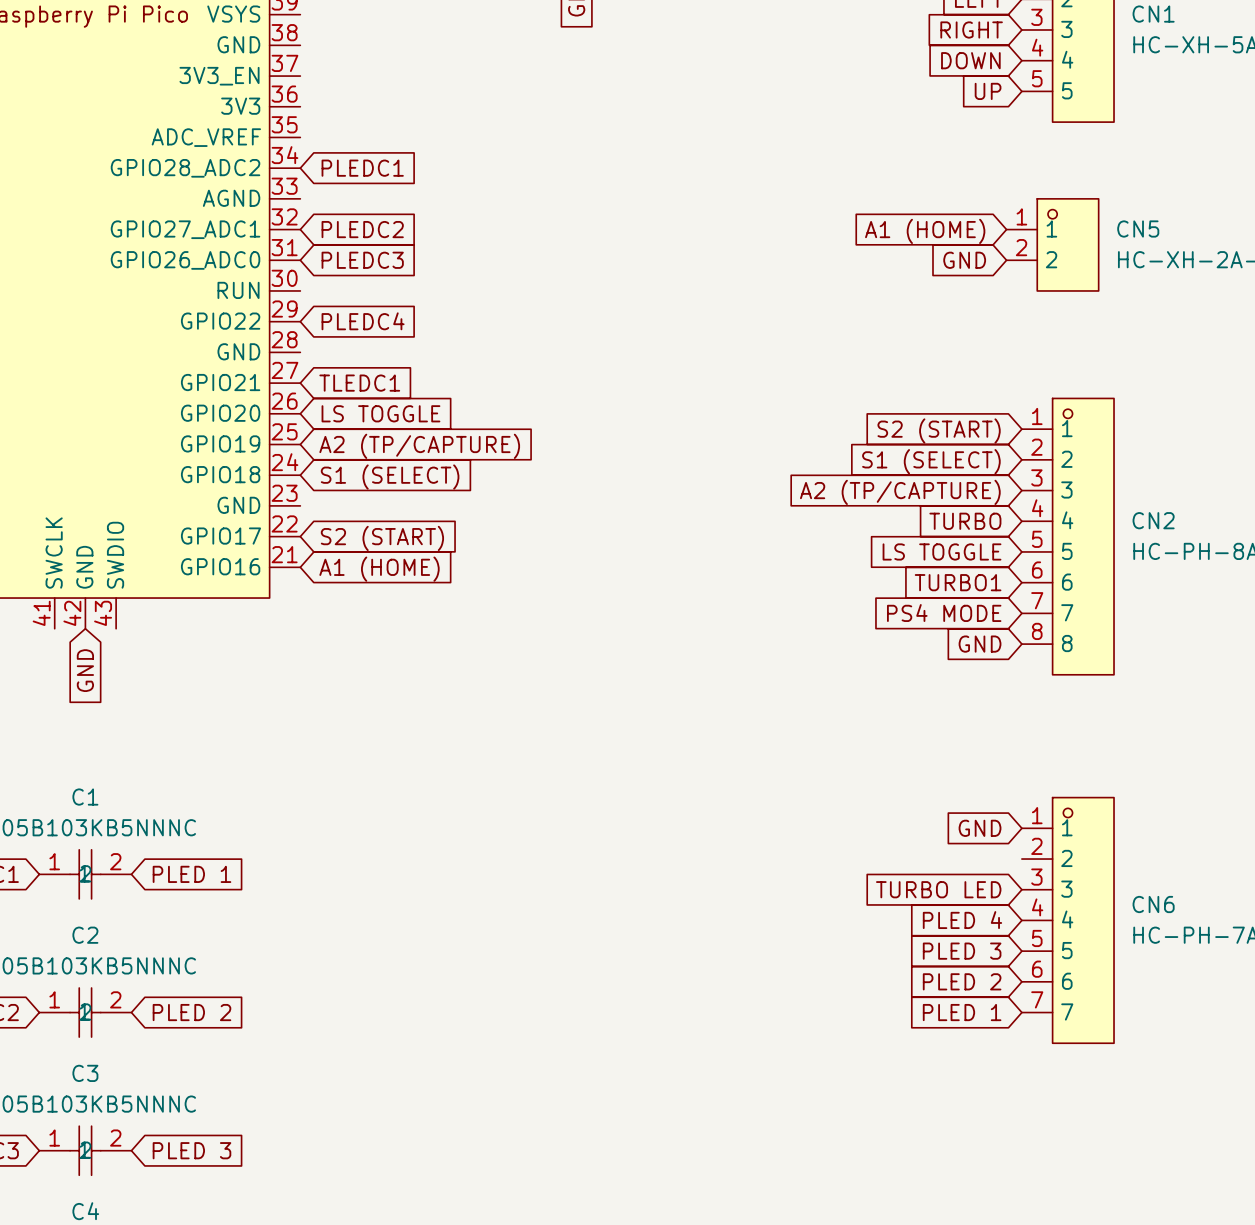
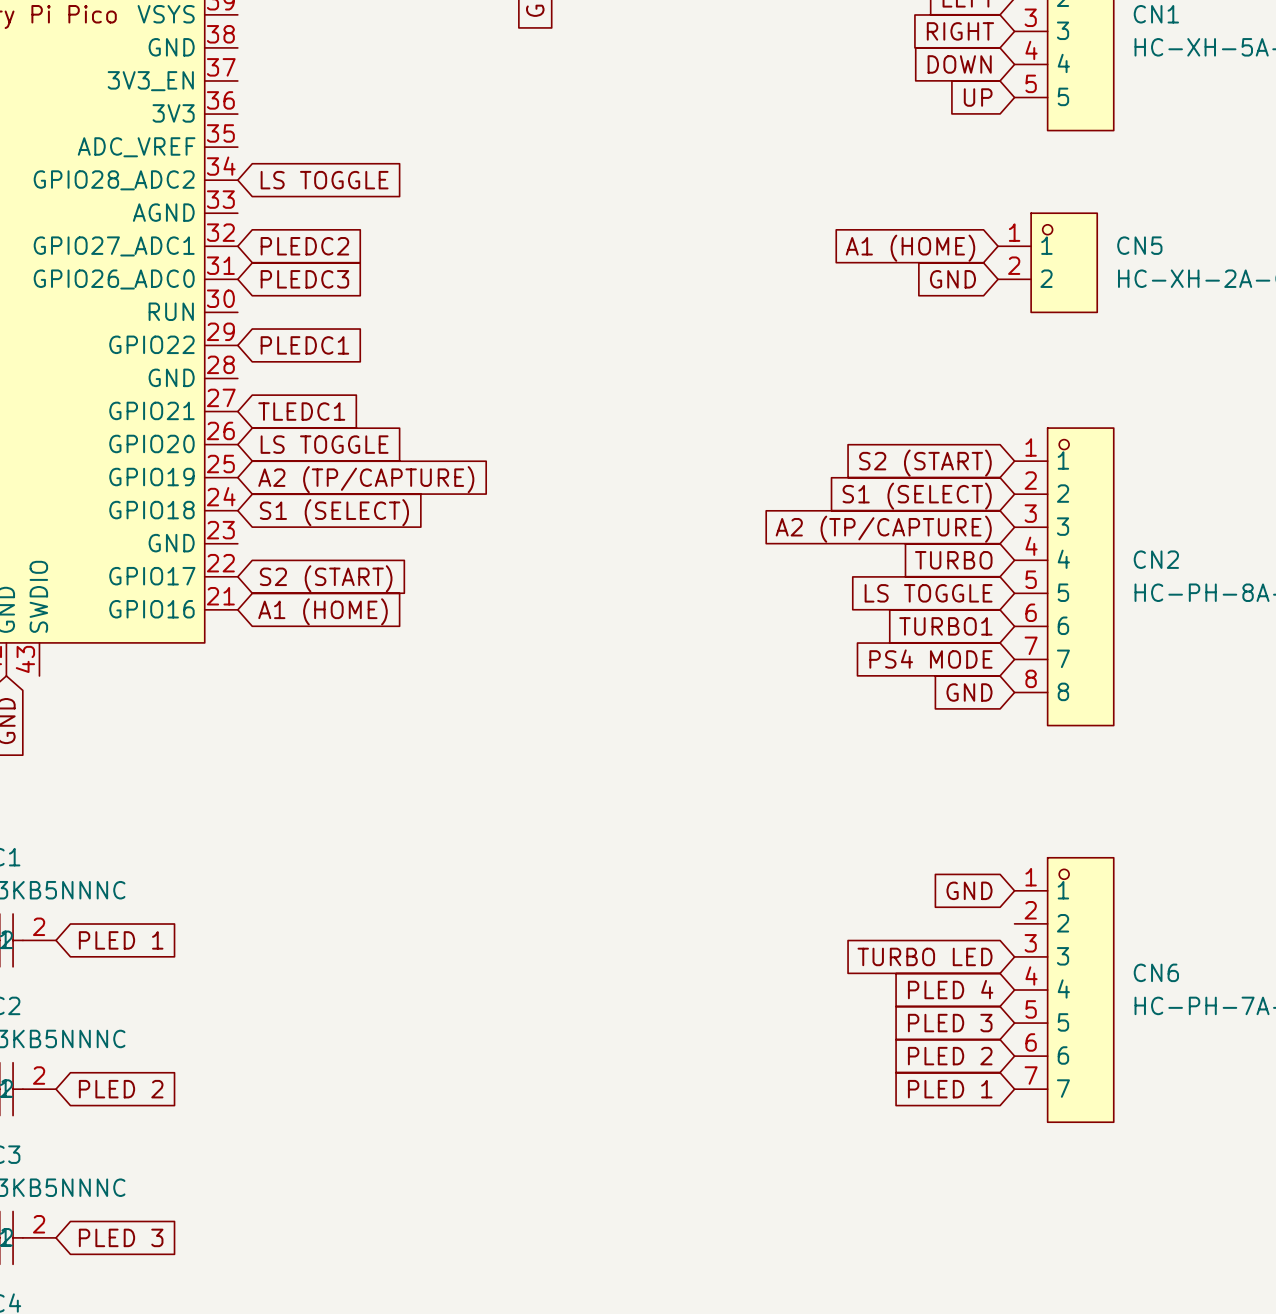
global label: PLEDC1 (362, 168) -> LS TOGGLE (324, 180)
global label: PLEDC4 (363, 321) -> PLEDC1 (304, 345)

